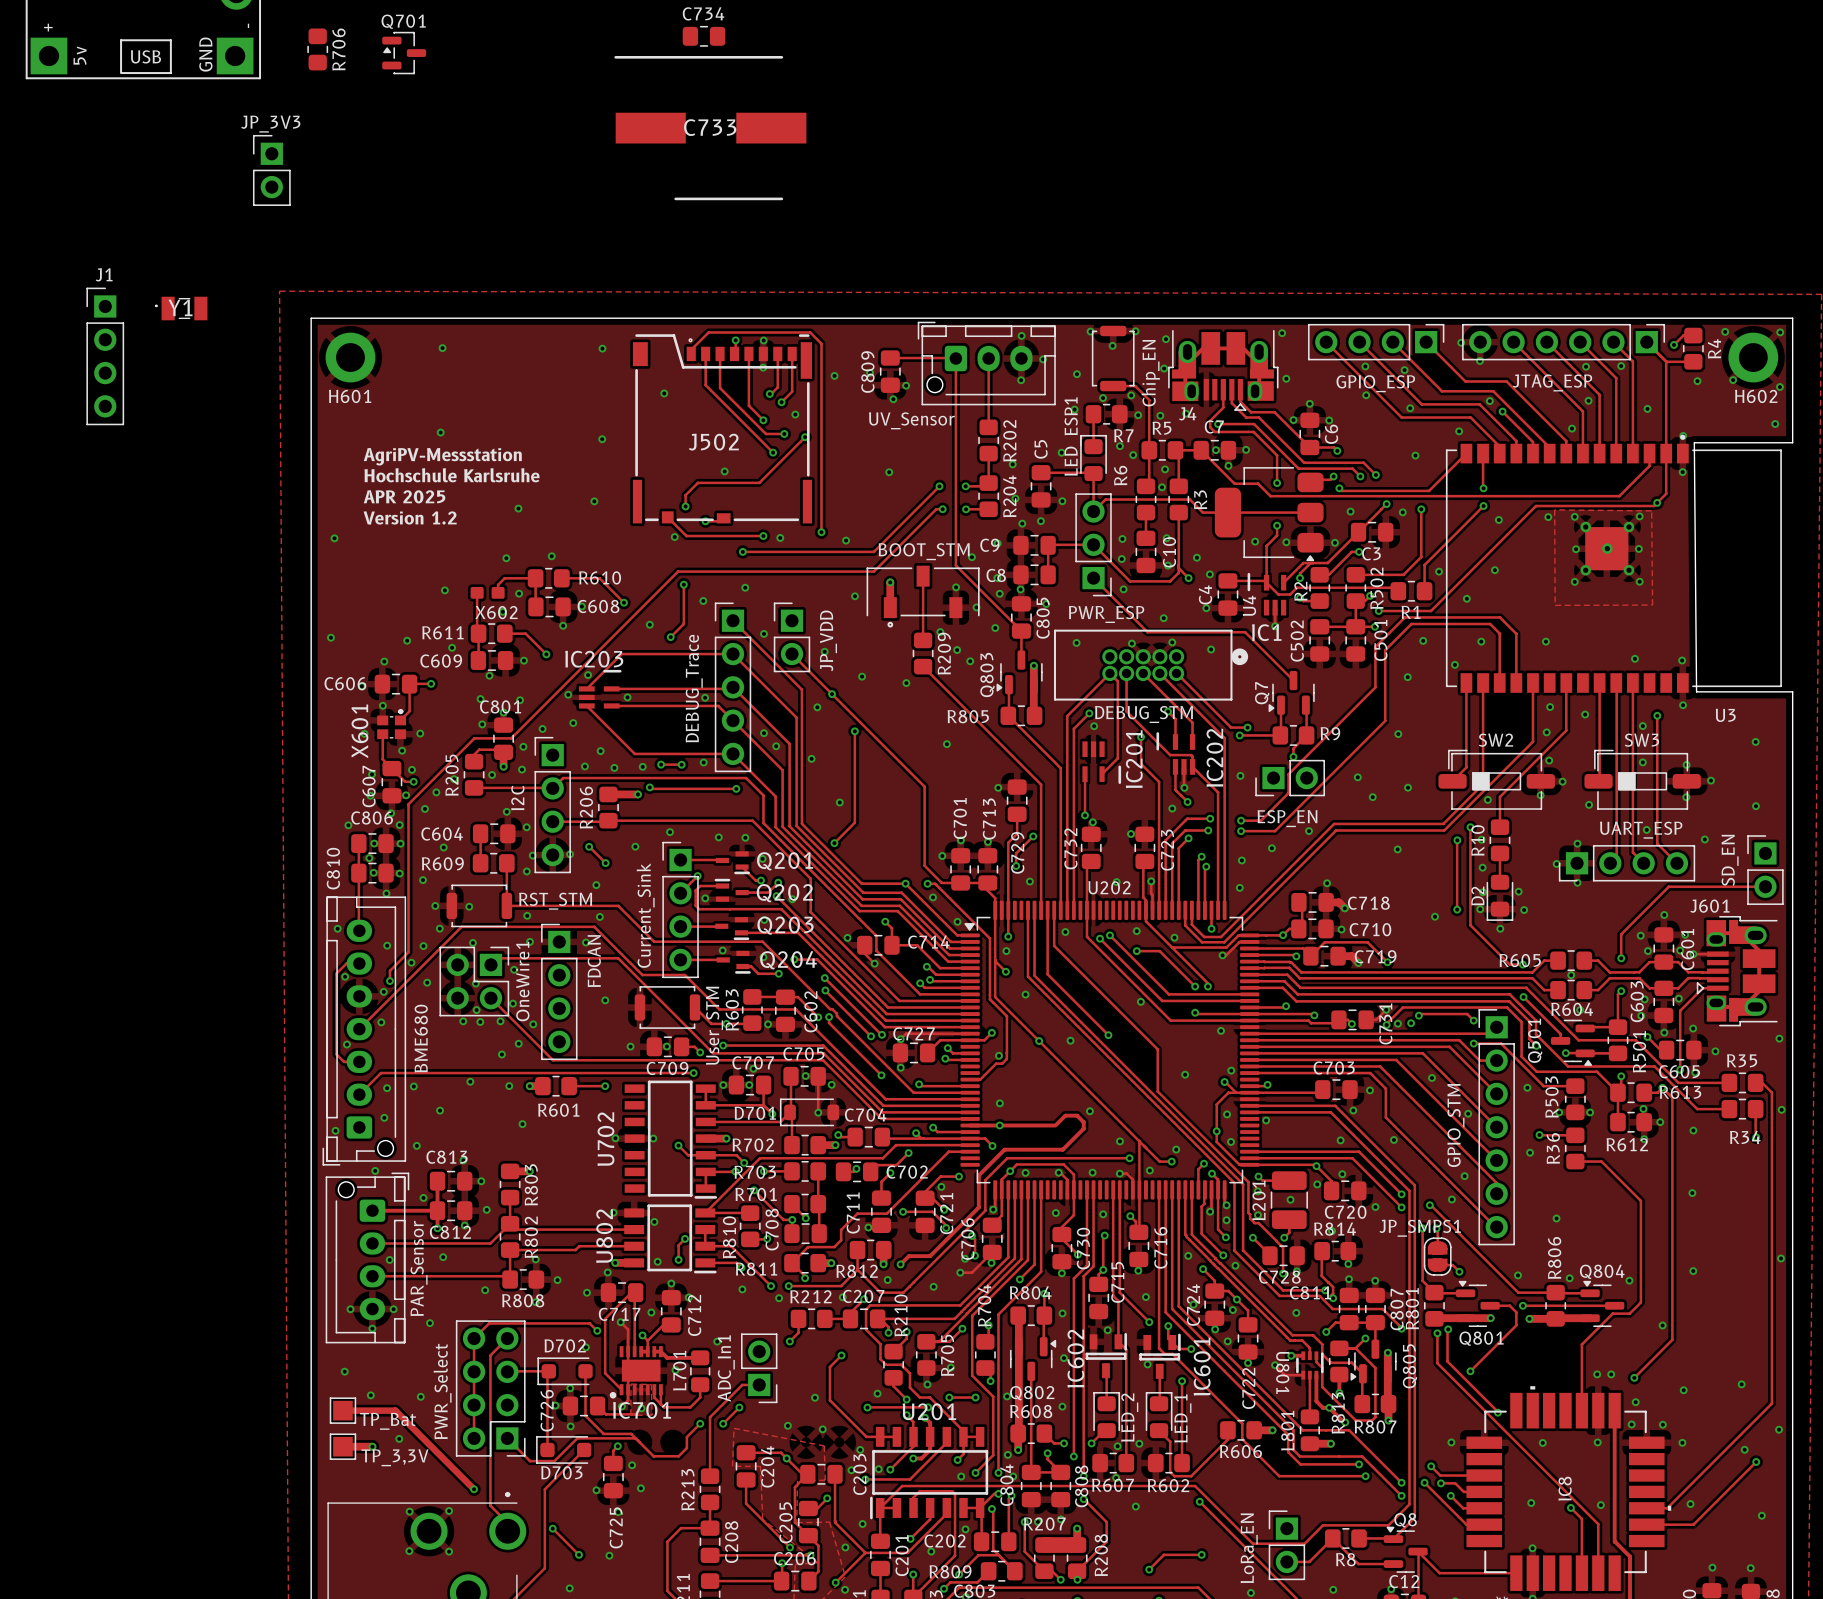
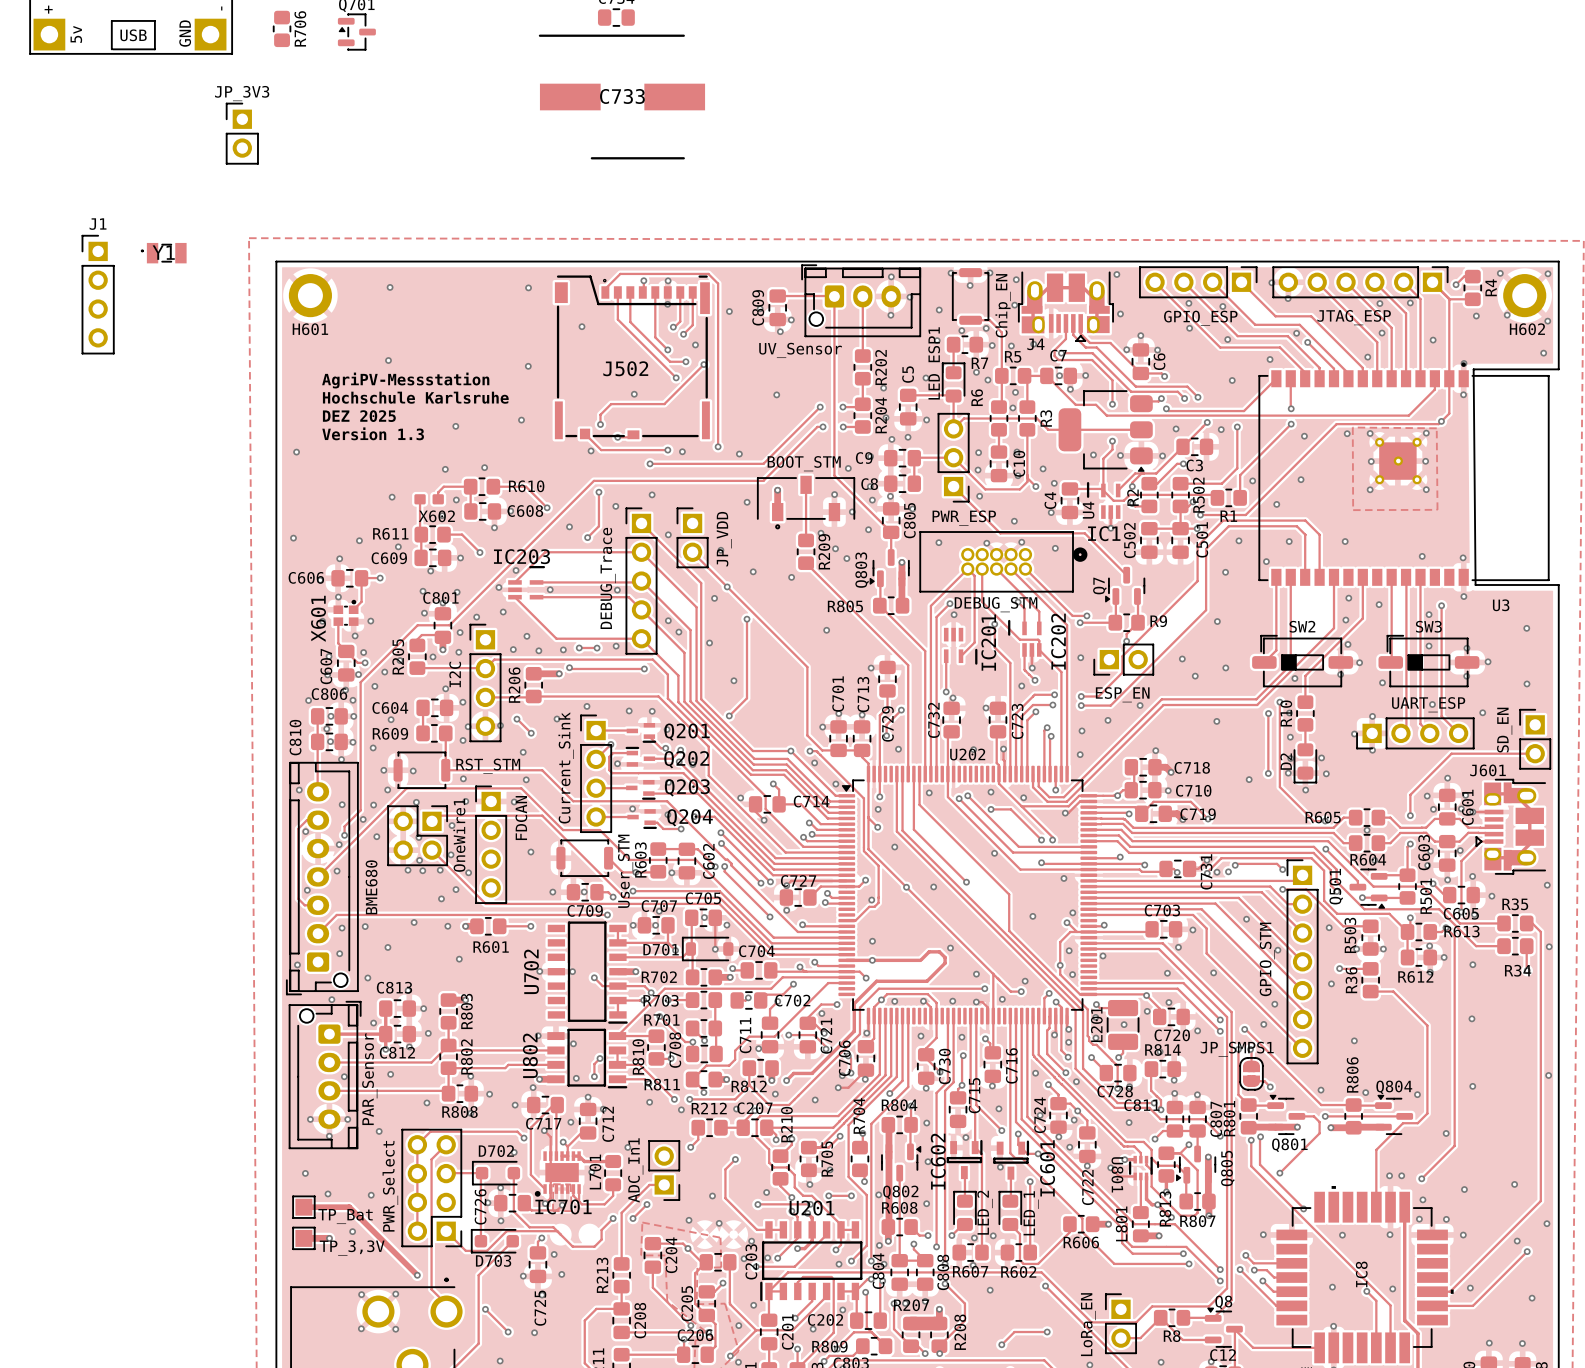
text: APR 2025 (404, 496) -> DEZ 2025 (359, 416)
text: Version 1.2 (410, 517) -> Version 1.3 (373, 433)

